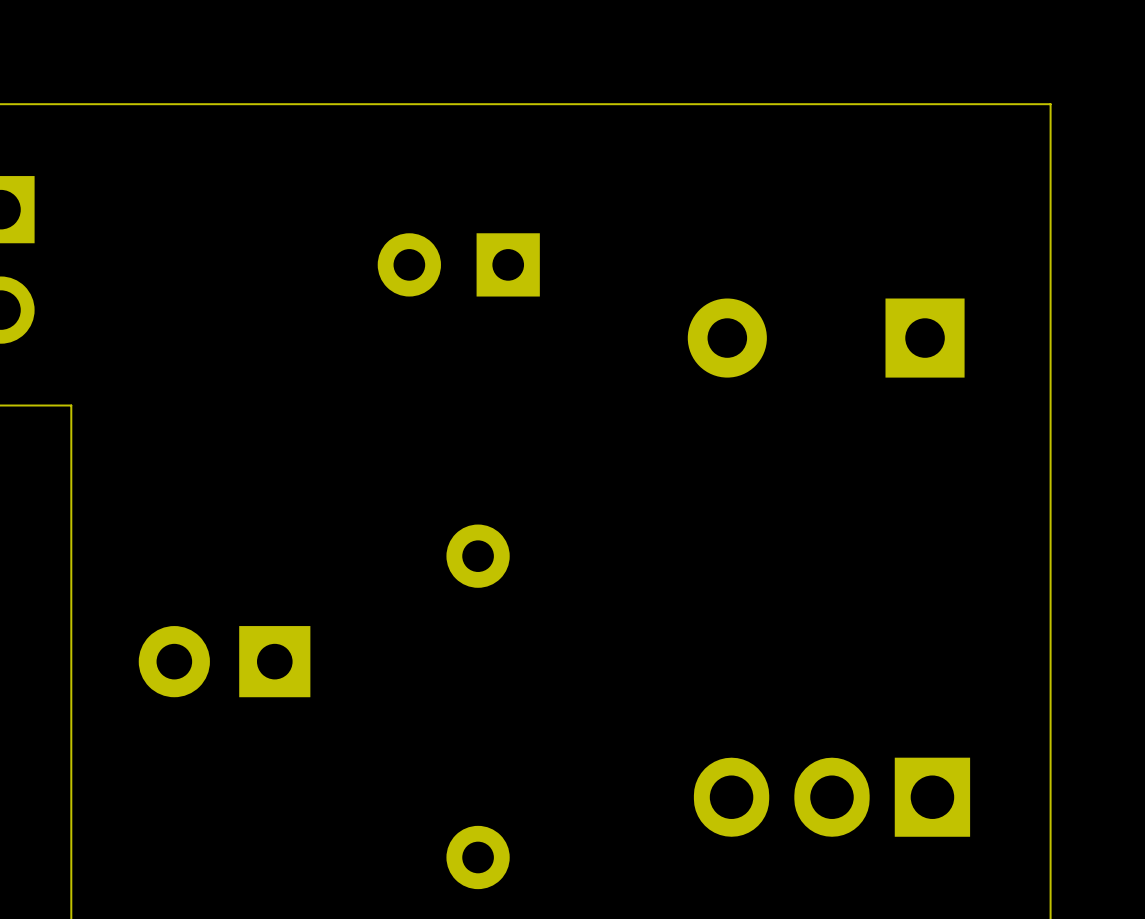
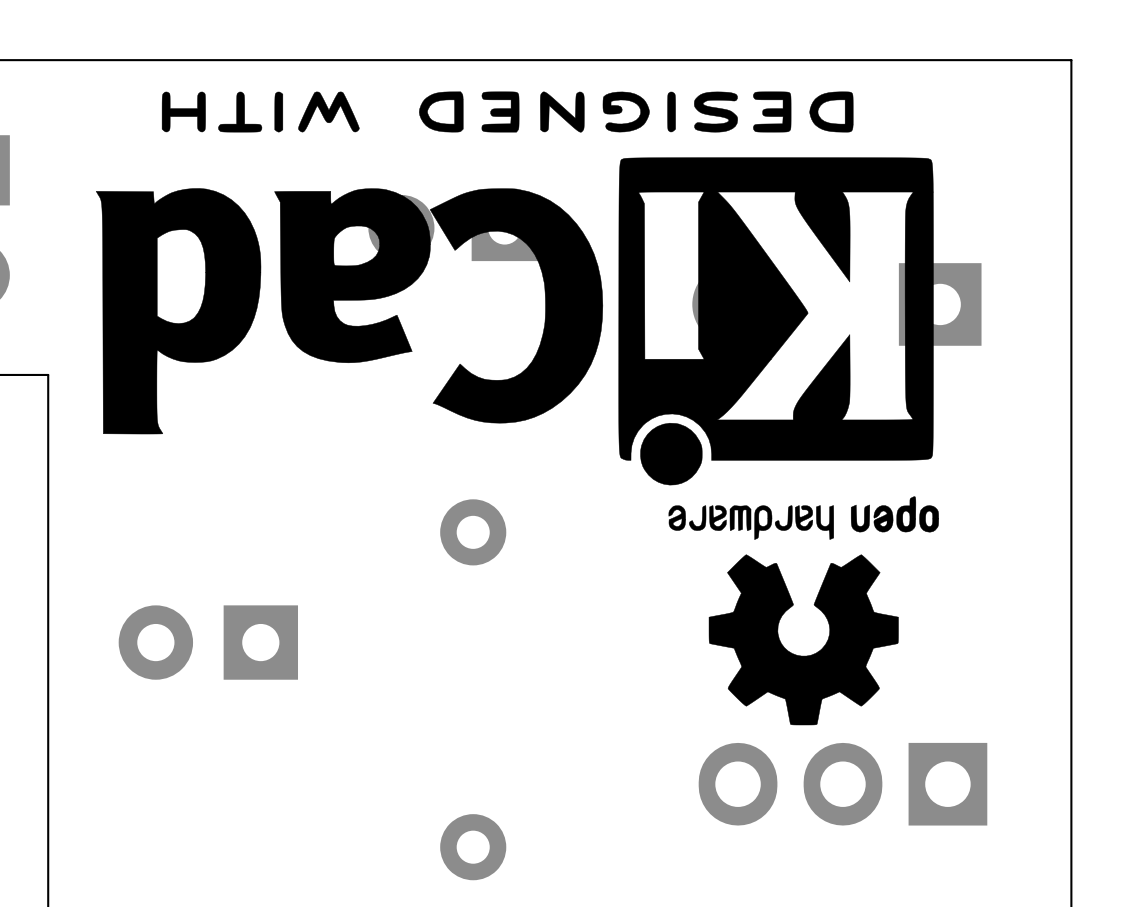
drawing: none -> [95, 91, 939, 726]

